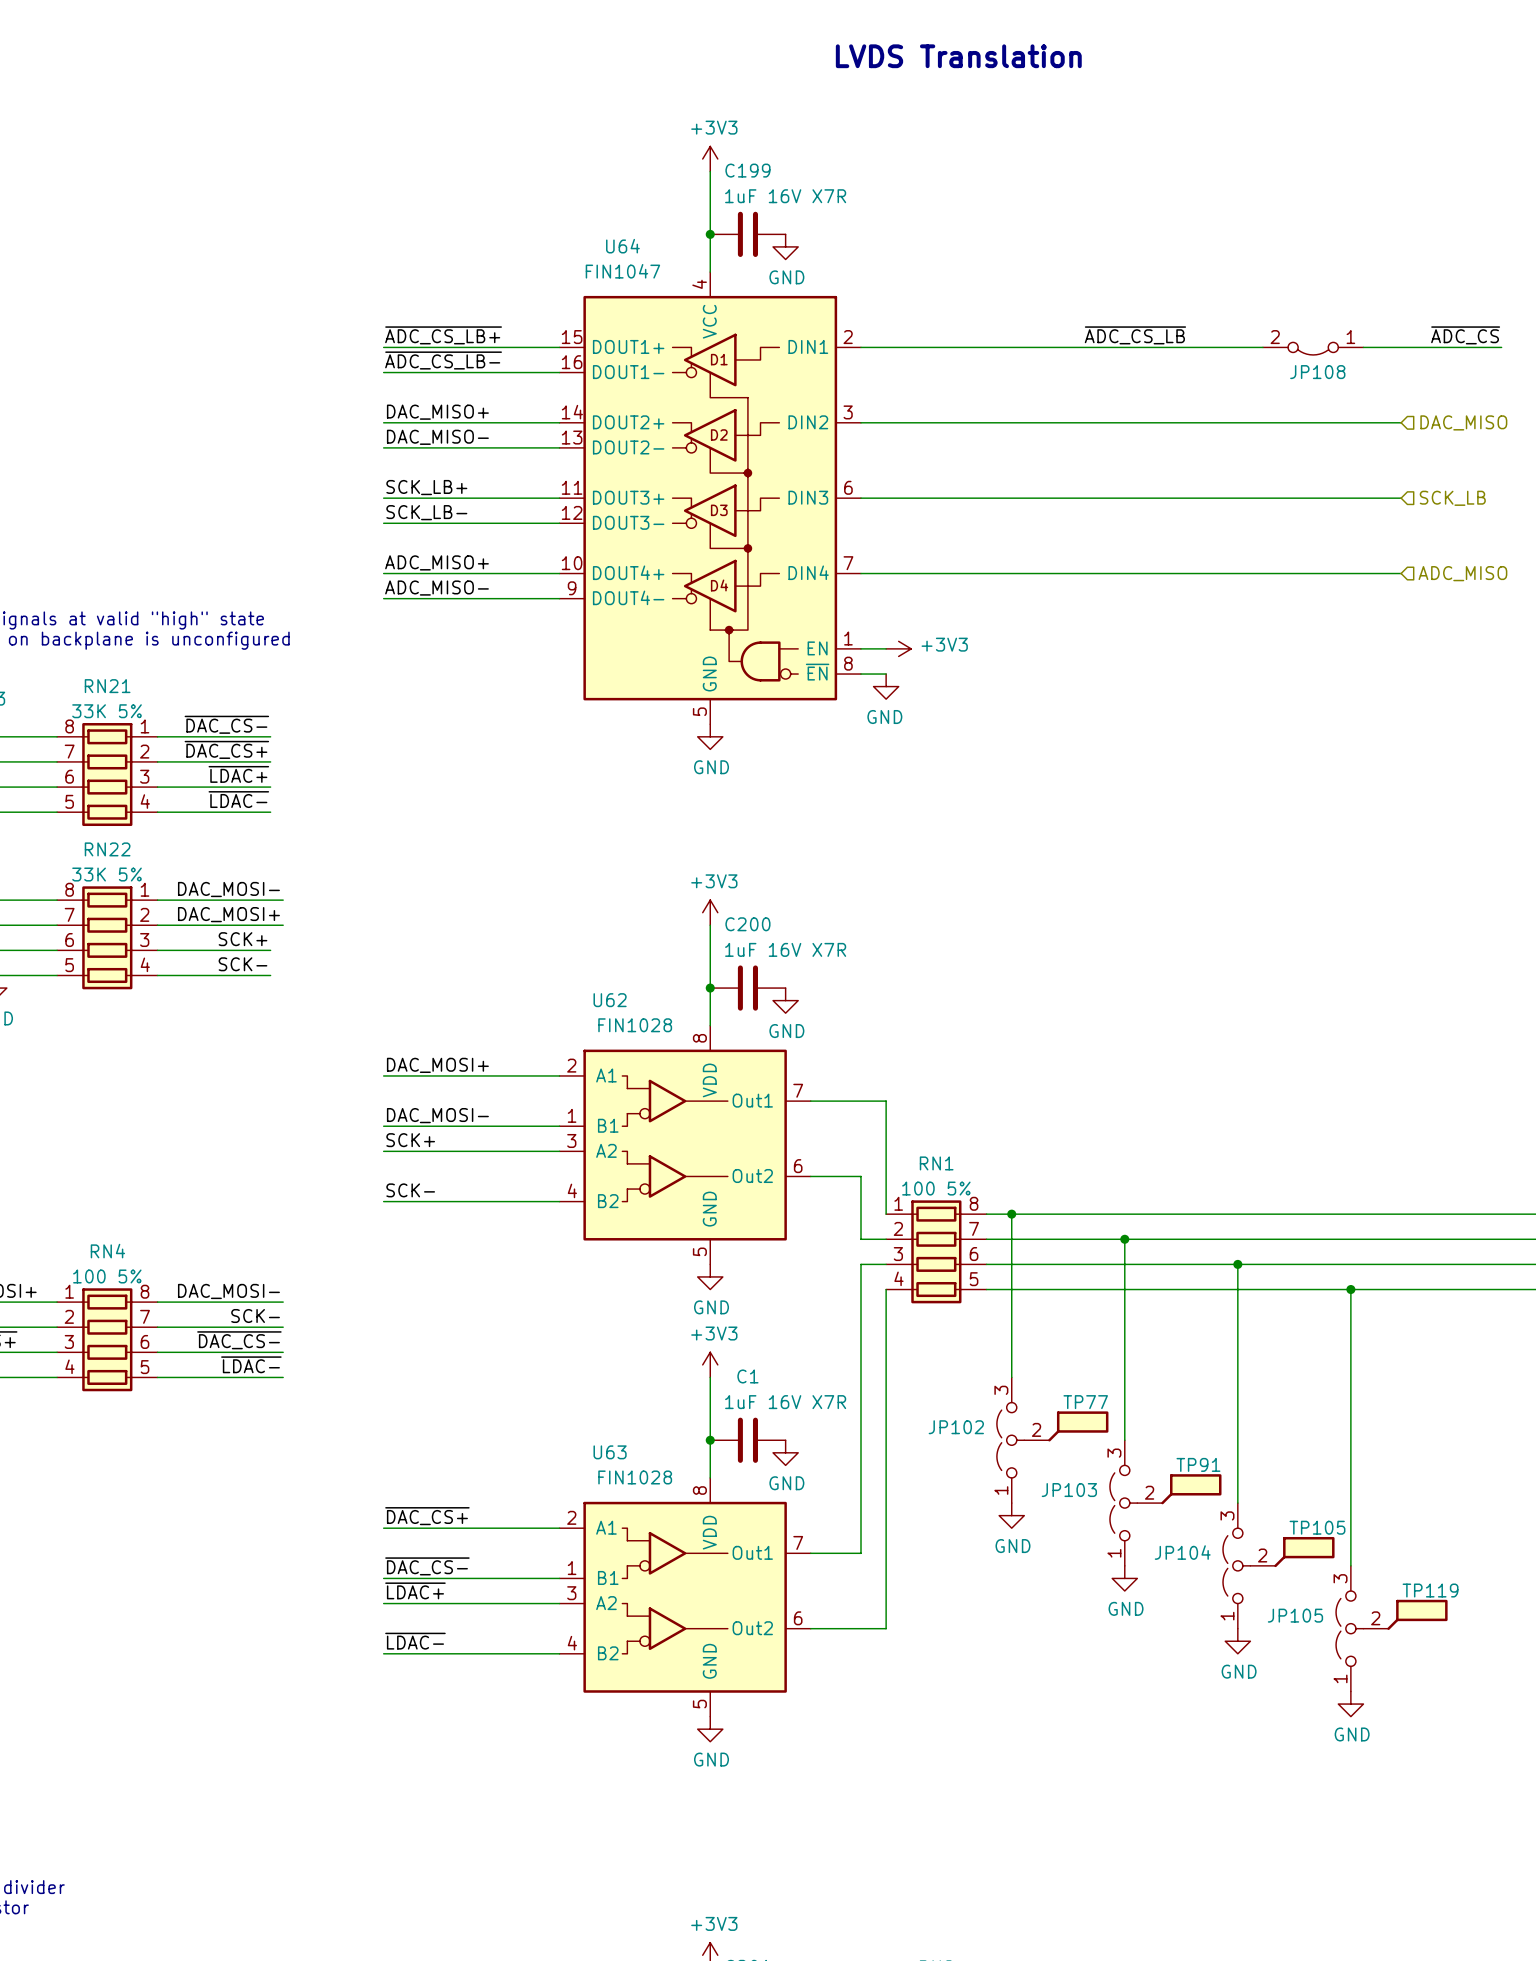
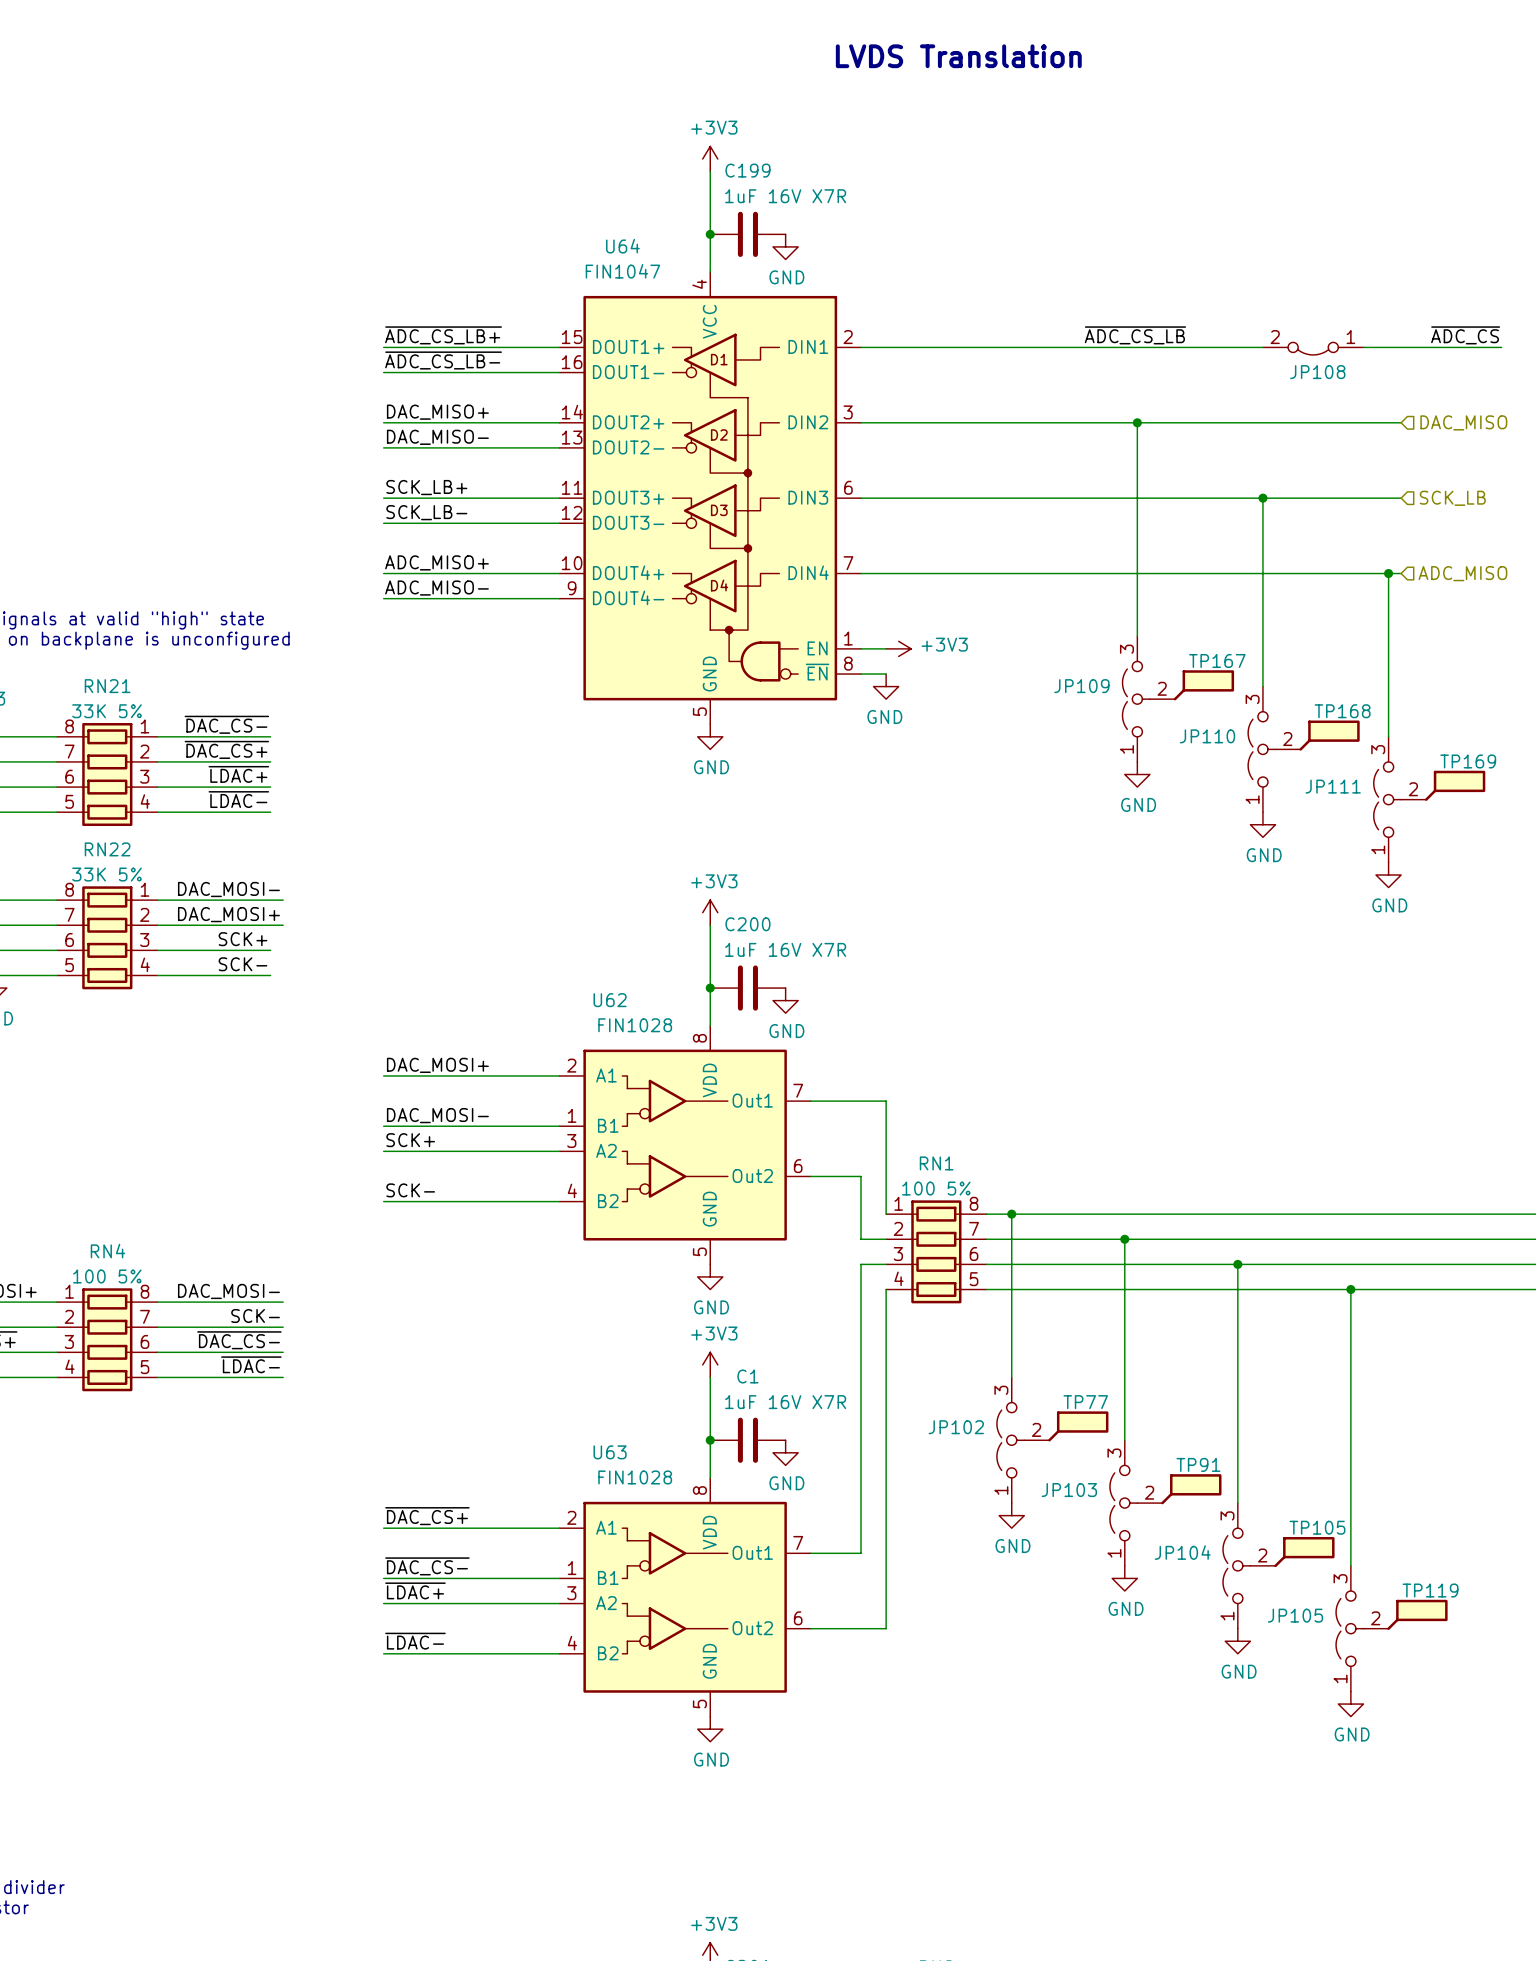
wire: none -> (1137, 422) (1137, 636)
junction: none -> (1137, 422)
wire: none -> (1262, 498) (1262, 686)
junction: none -> (1262, 498)
wire: none -> (1388, 573) (1388, 736)
junction: none -> (1388, 573)
TP167: none -> (1203, 685)
JP109: none -> (1148, 699)
TP168: none -> (1329, 735)
JP110: none -> (1274, 749)
power symbol: none -> GND (1137, 774)
TP169: none -> (1455, 785)
JP111: none -> (1400, 799)
power symbol: none -> GND (1262, 824)
power symbol: none -> GND (1388, 875)

